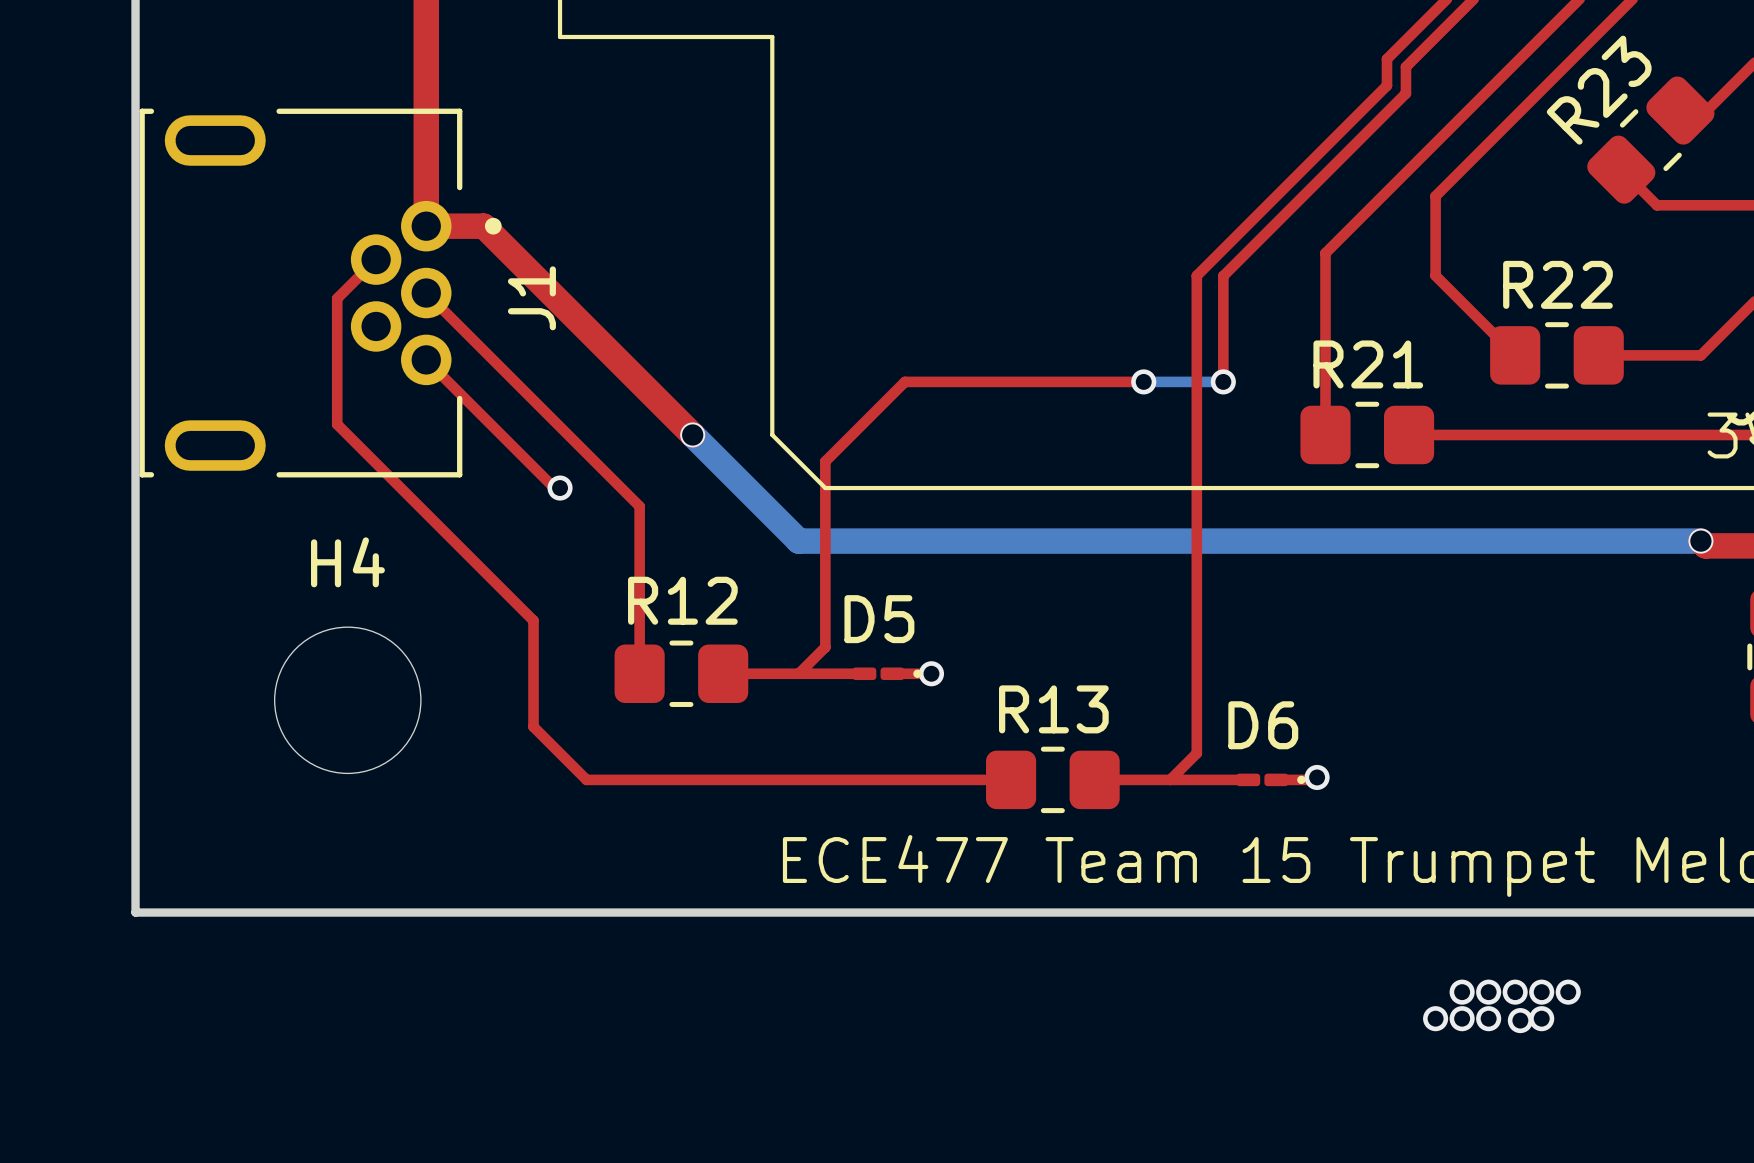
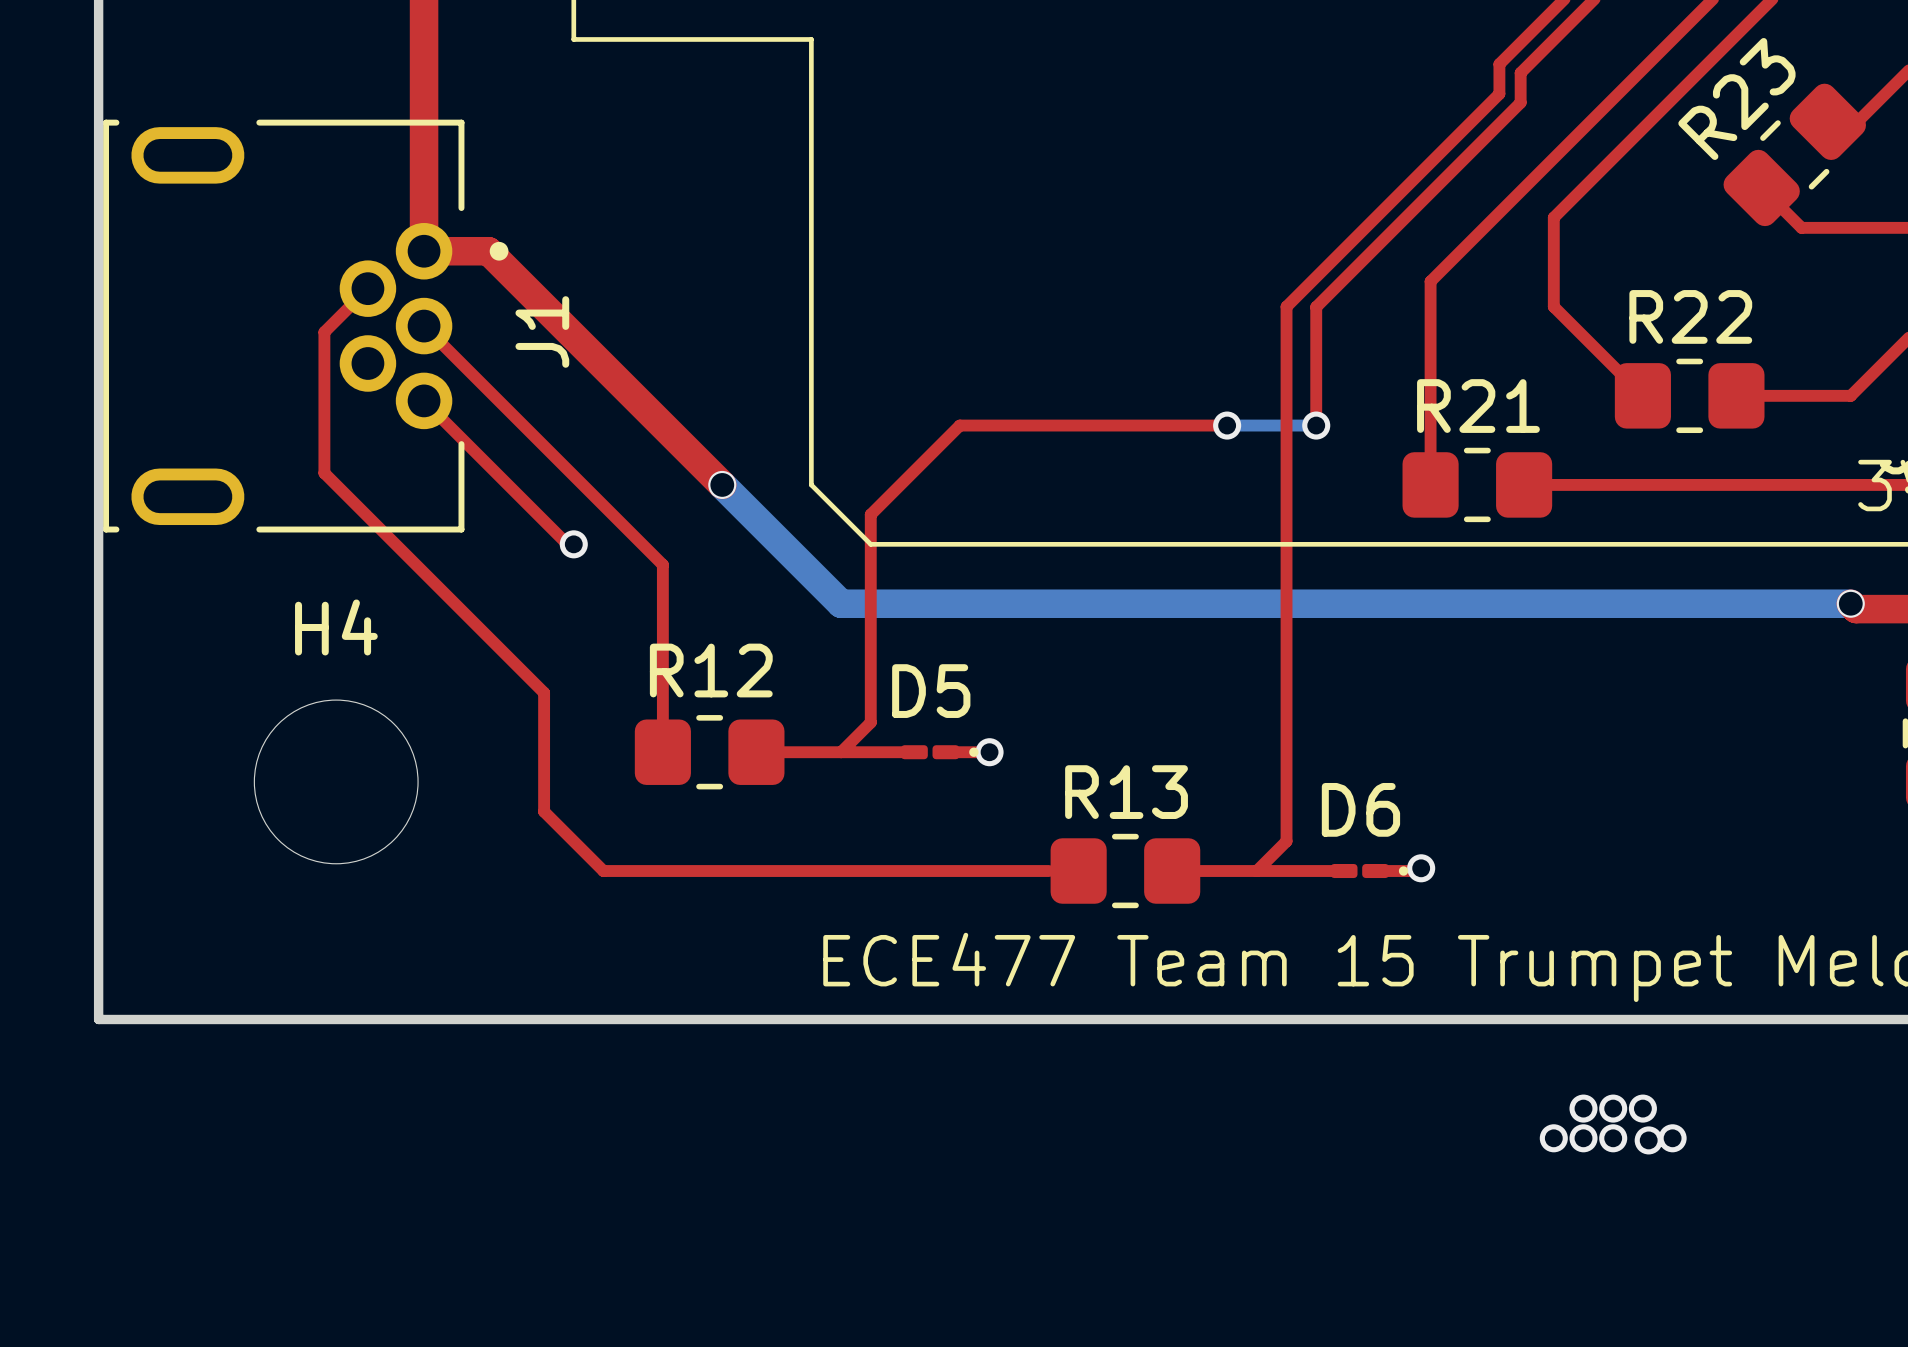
via: (1541, 992) -> none
via: (1568, 992) -> none

